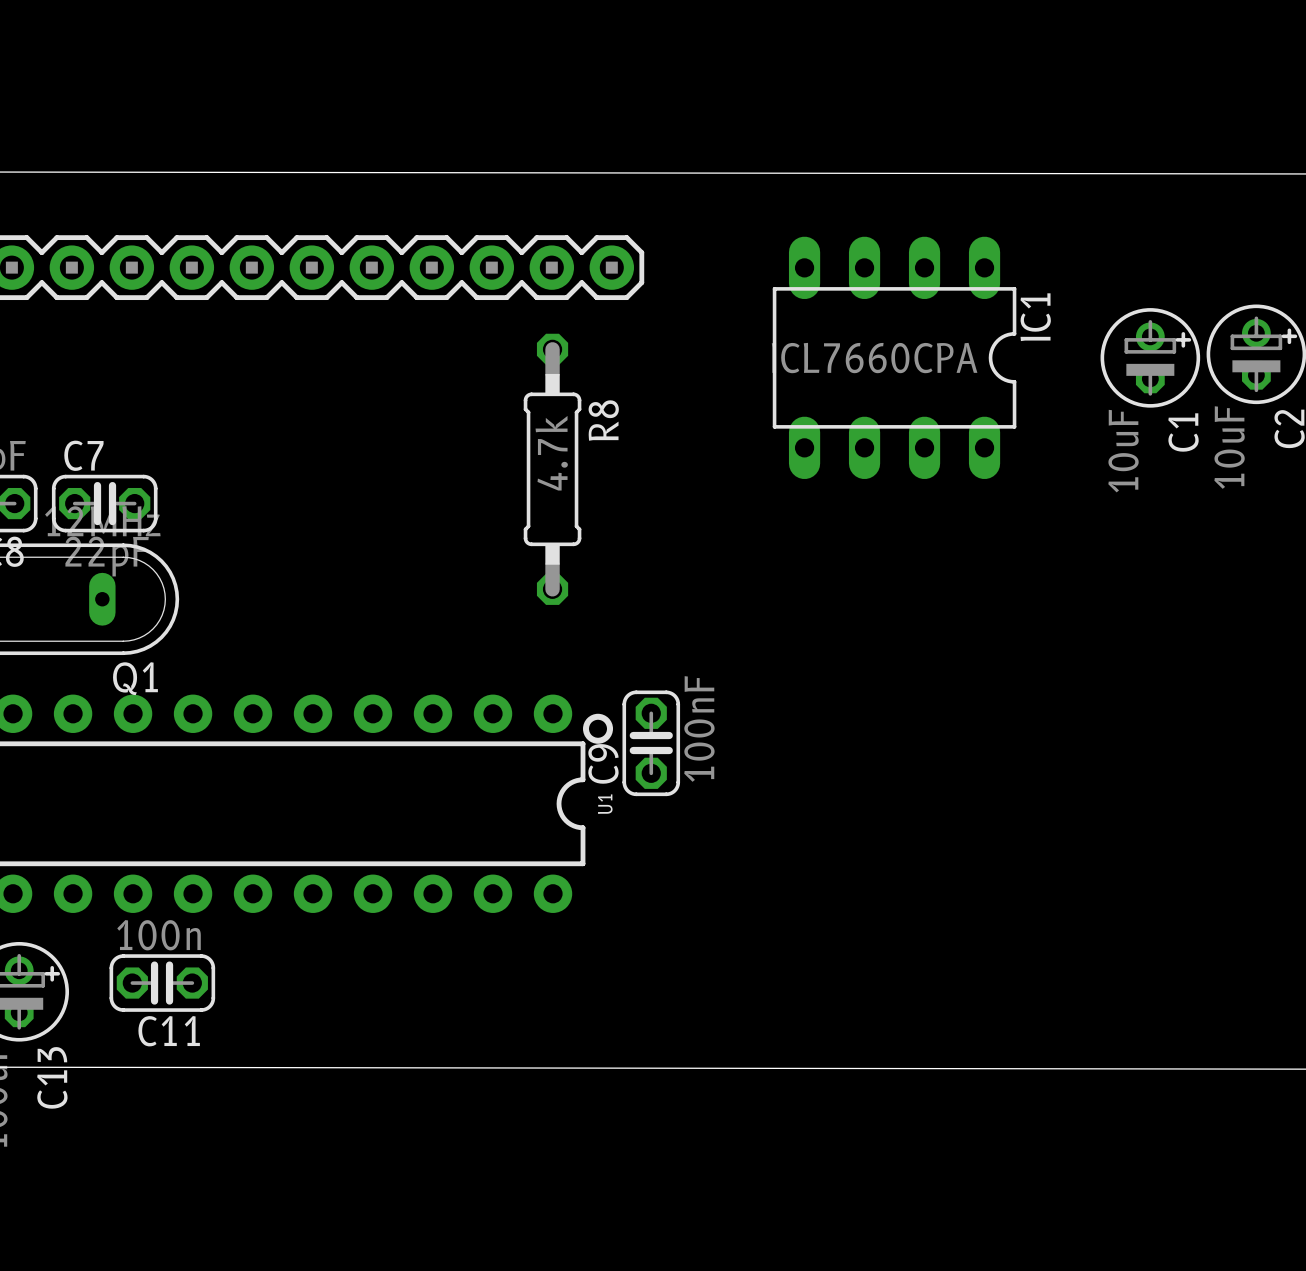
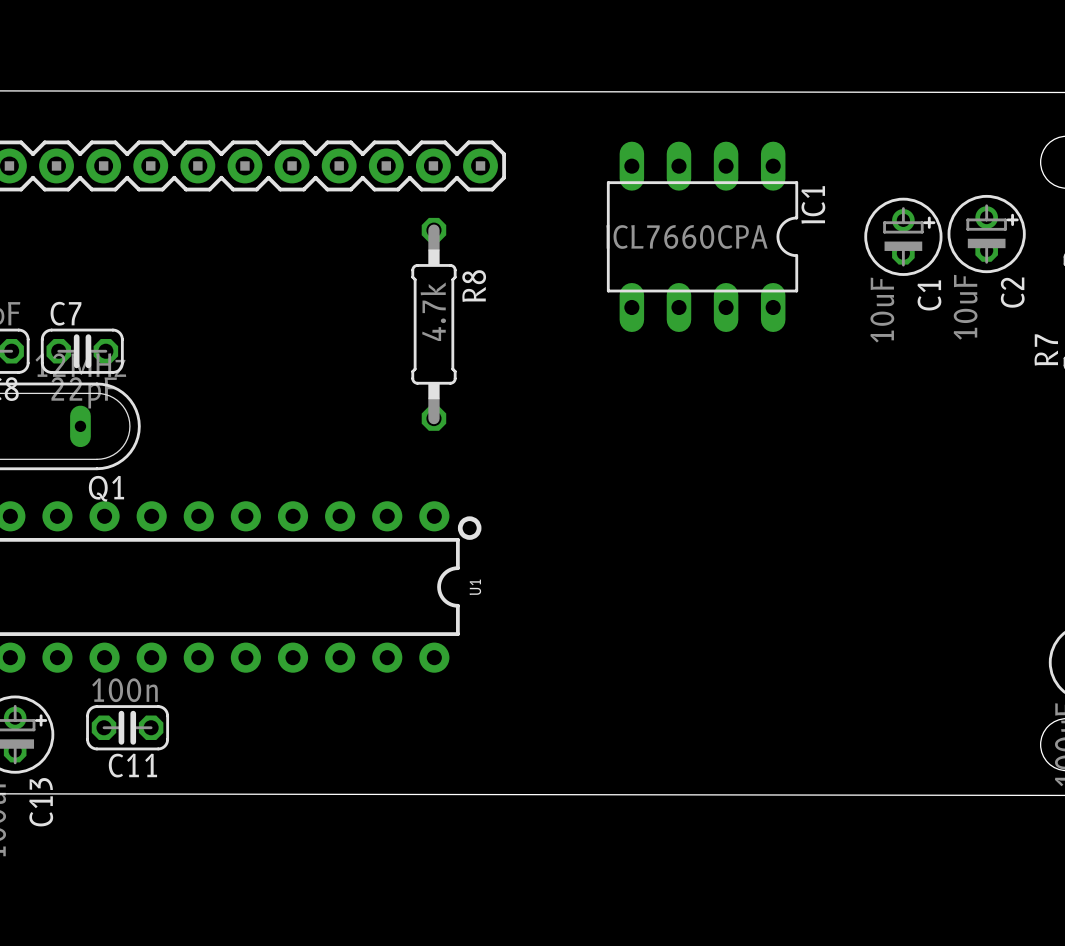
C9: 100nF (651, 743) -> none

